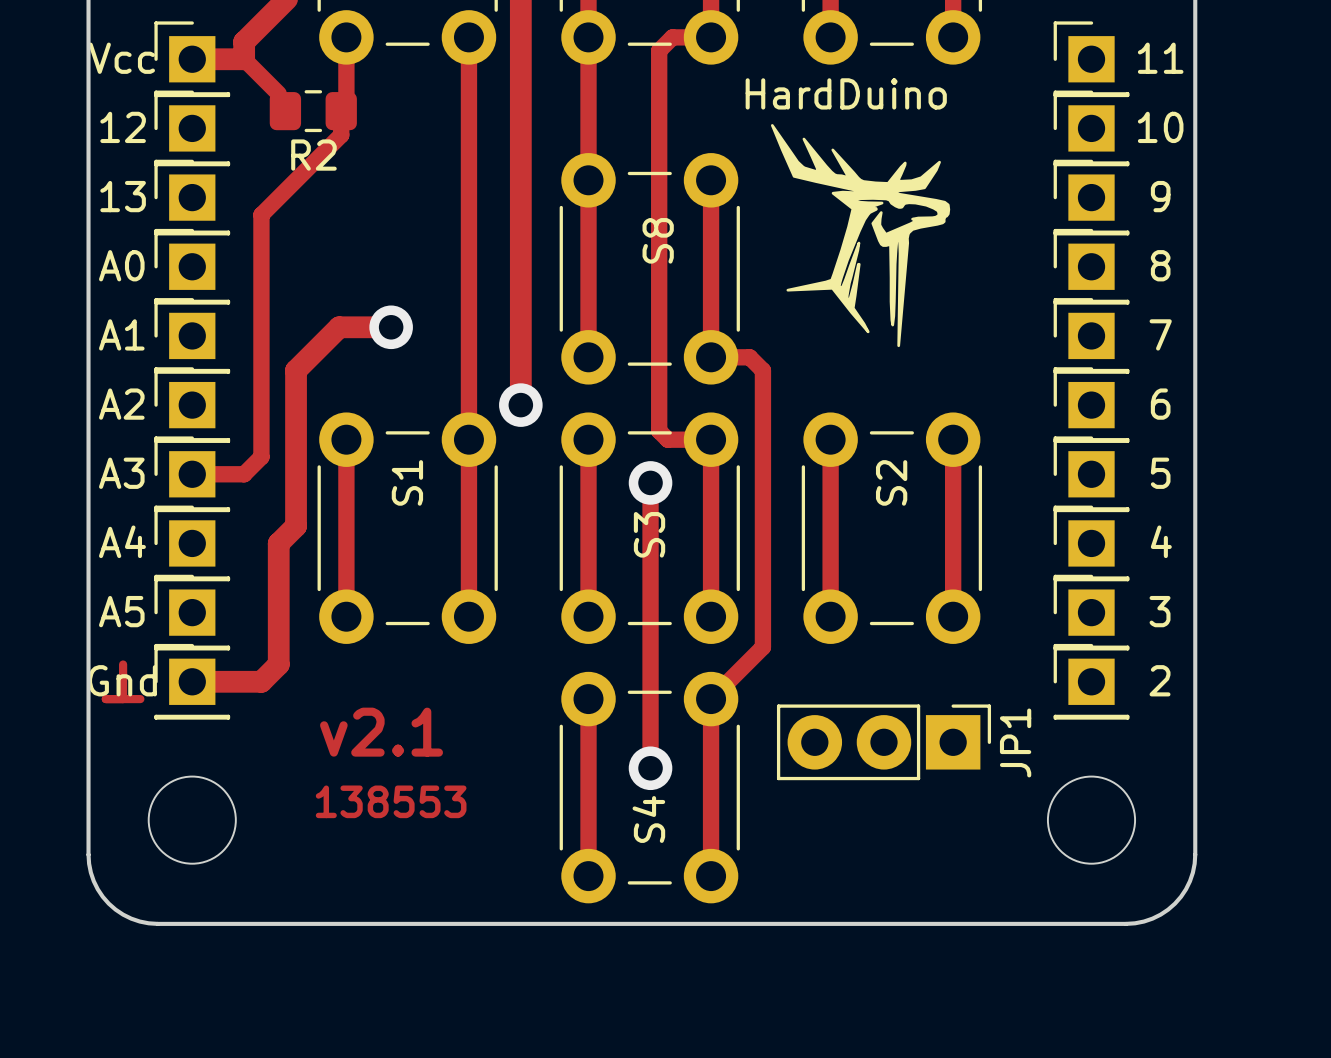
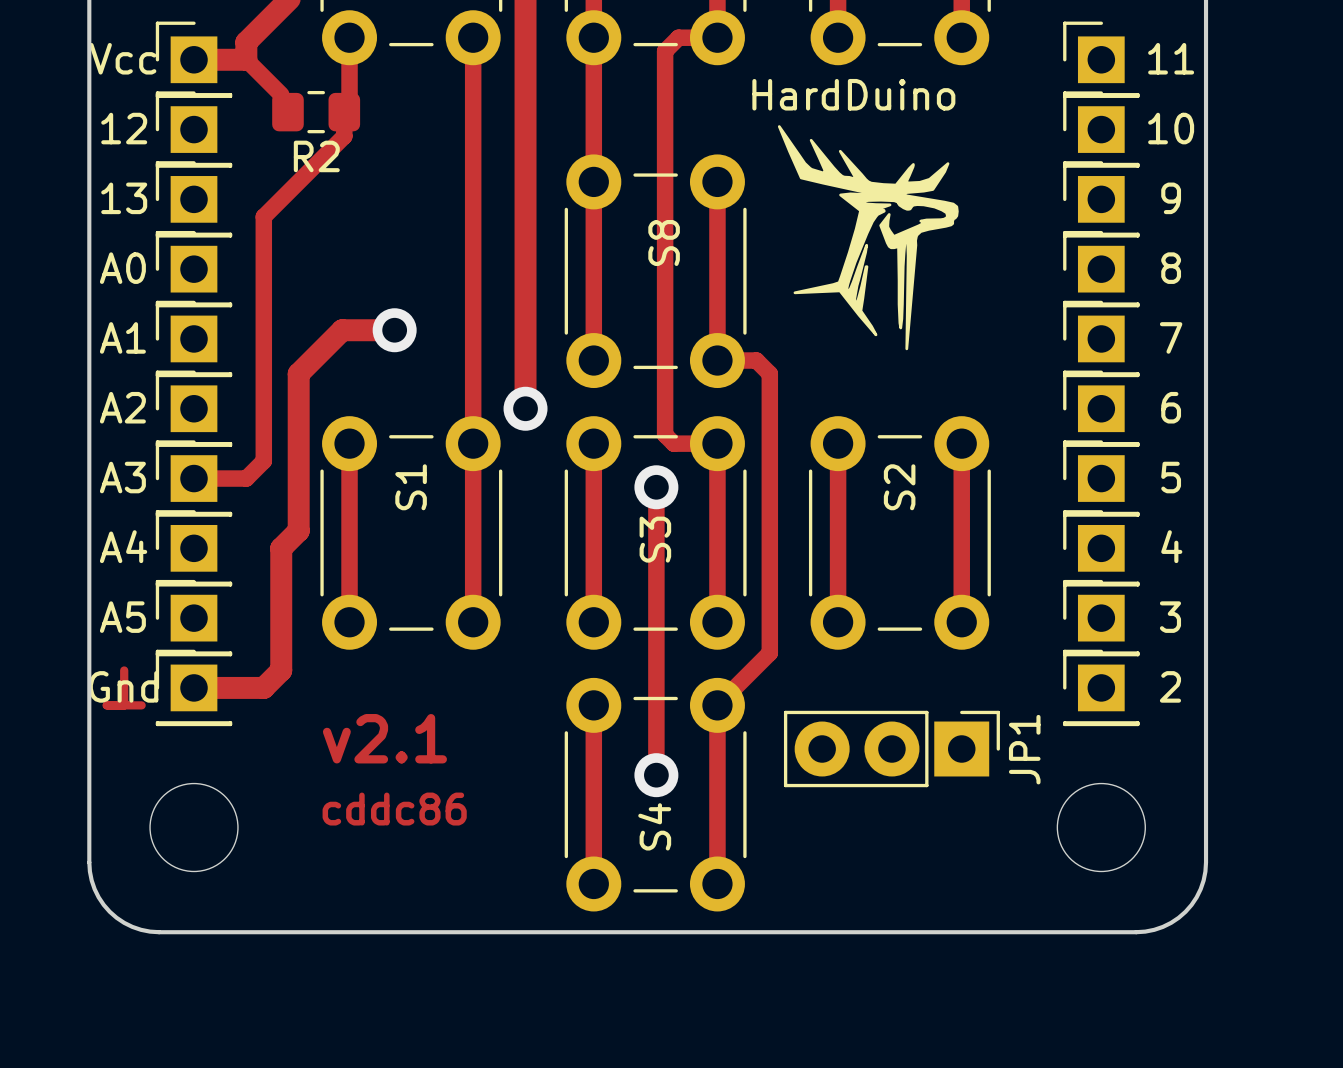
text: 138553 (391, 801) -> cddc86 (394, 809)

